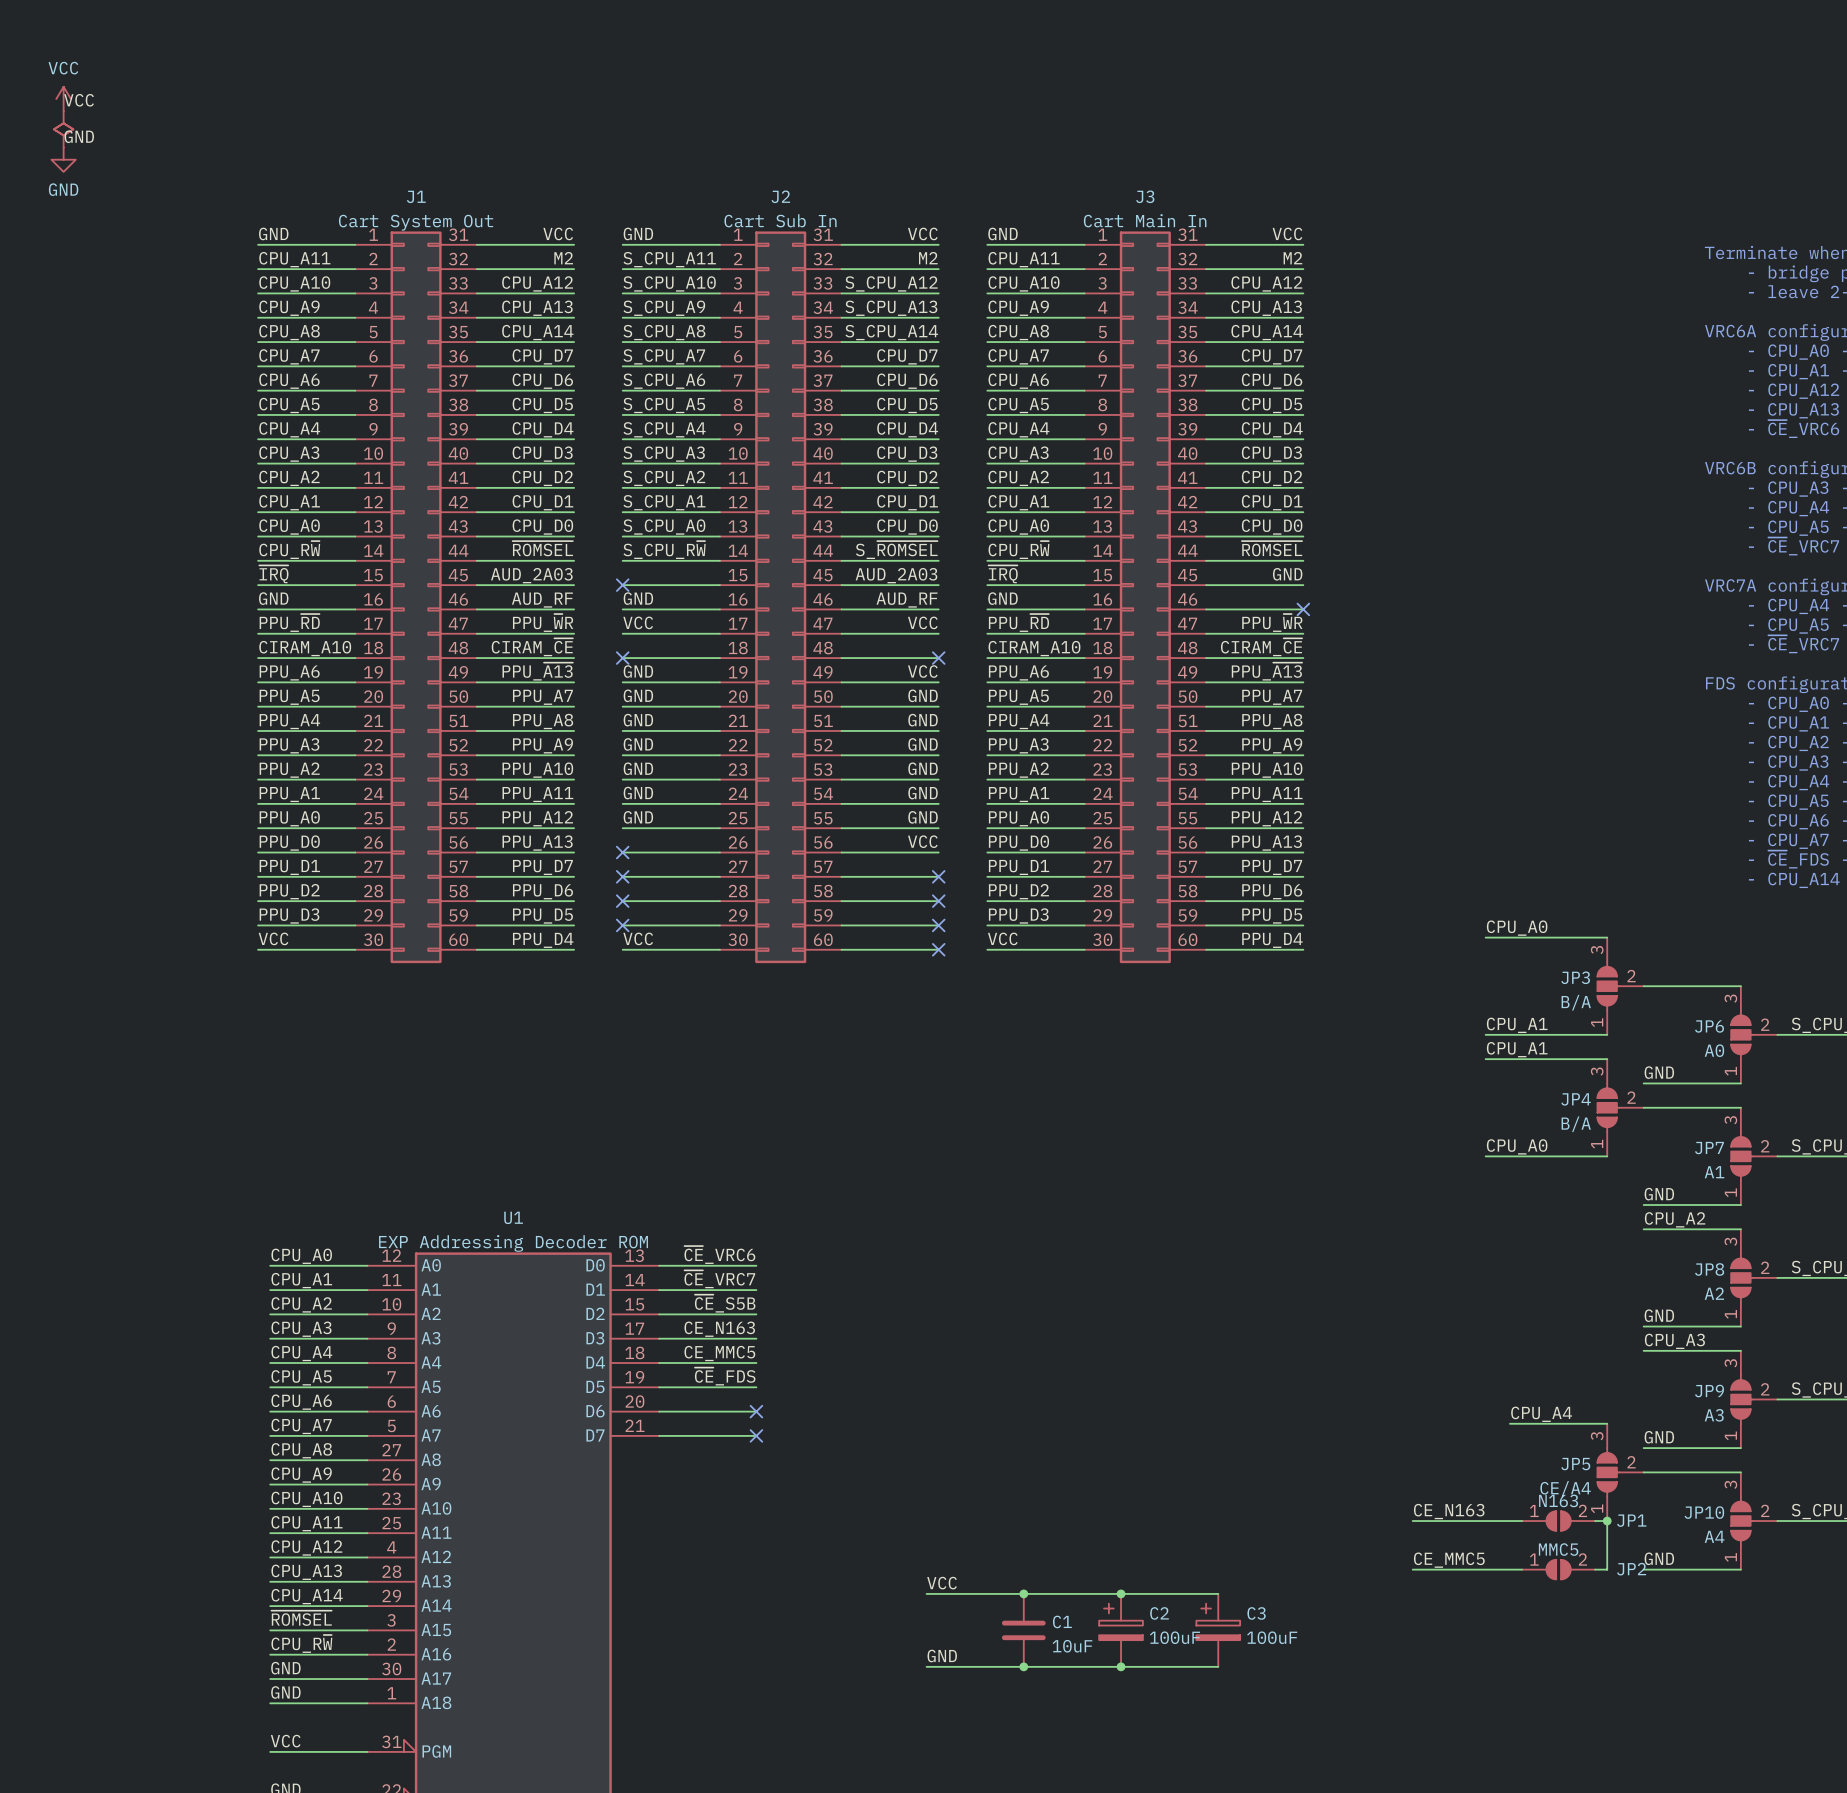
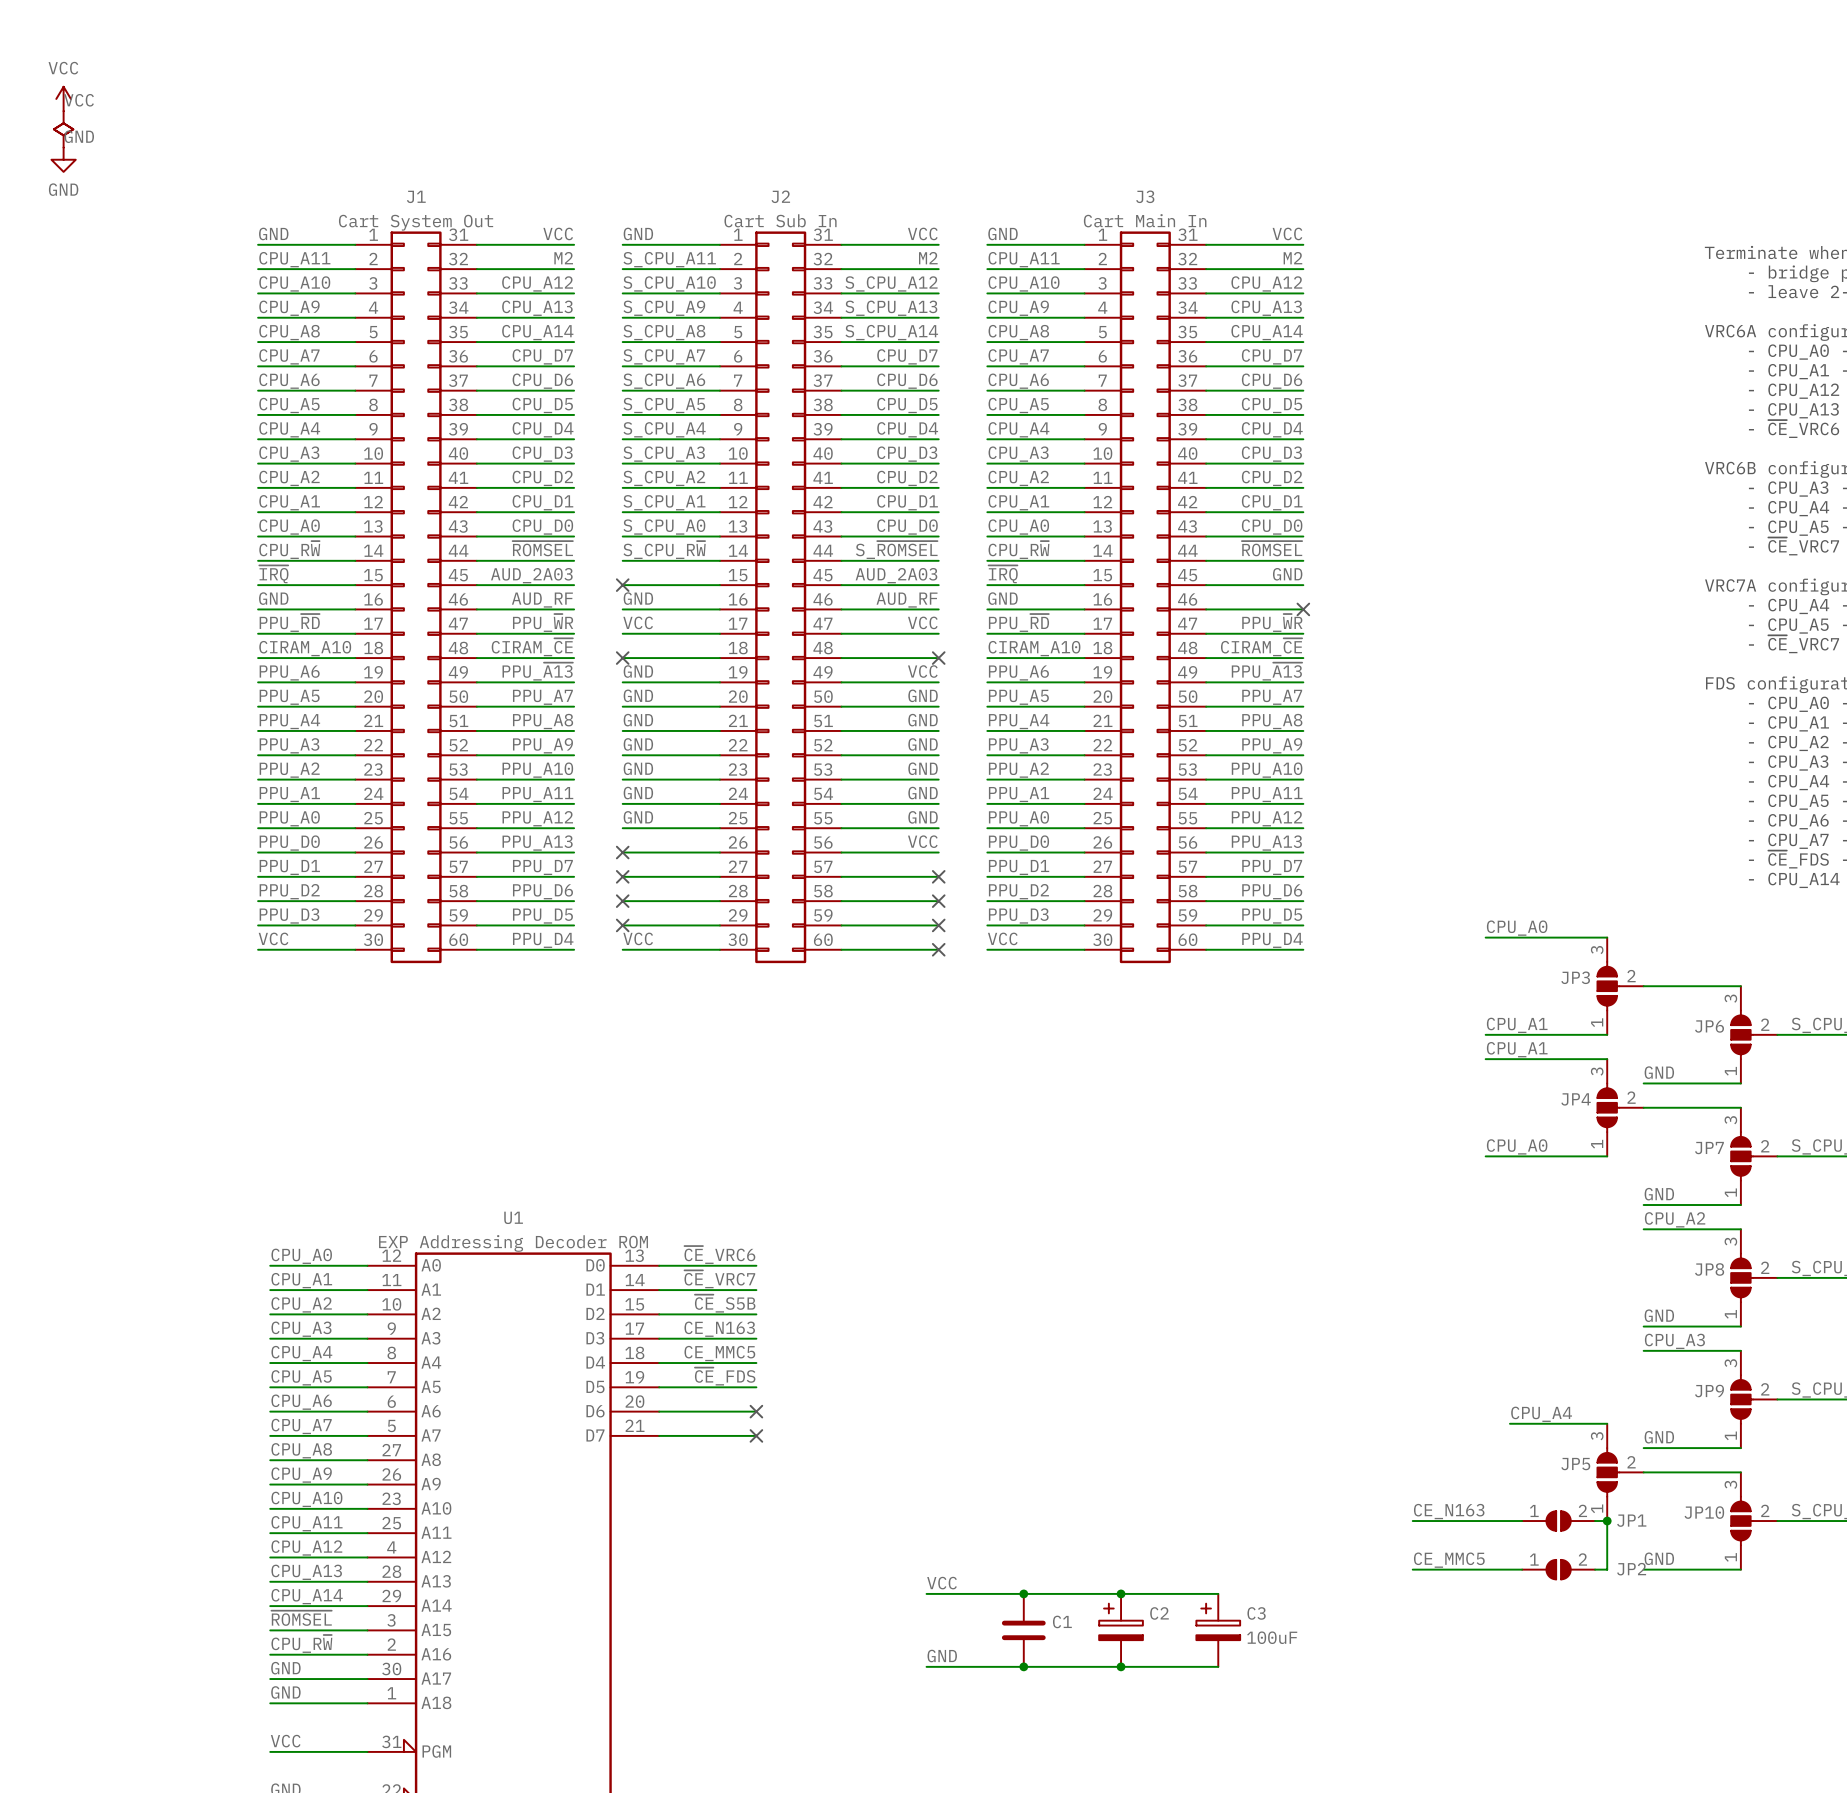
JP3 value: B/A (1576, 1002) -> none
JP6 value: A0 (1714, 1050) -> none
JP4 value: B/A (1576, 1124) -> none
JP7 value: A1 (1714, 1172) -> none
JP8 value: A2 (1714, 1293) -> none
JP9 value: A3 (1714, 1415) -> none
JP5 value: CE/A4 (1565, 1488) -> none
JP1 value: N163 (1558, 1500) -> none
JP10 value: A4 (1714, 1536) -> none
JP2 value: MMC5 (1558, 1549) -> none
C2 value: 100uF (1174, 1637) -> none
C1 value: 10uF (1072, 1646) -> none

